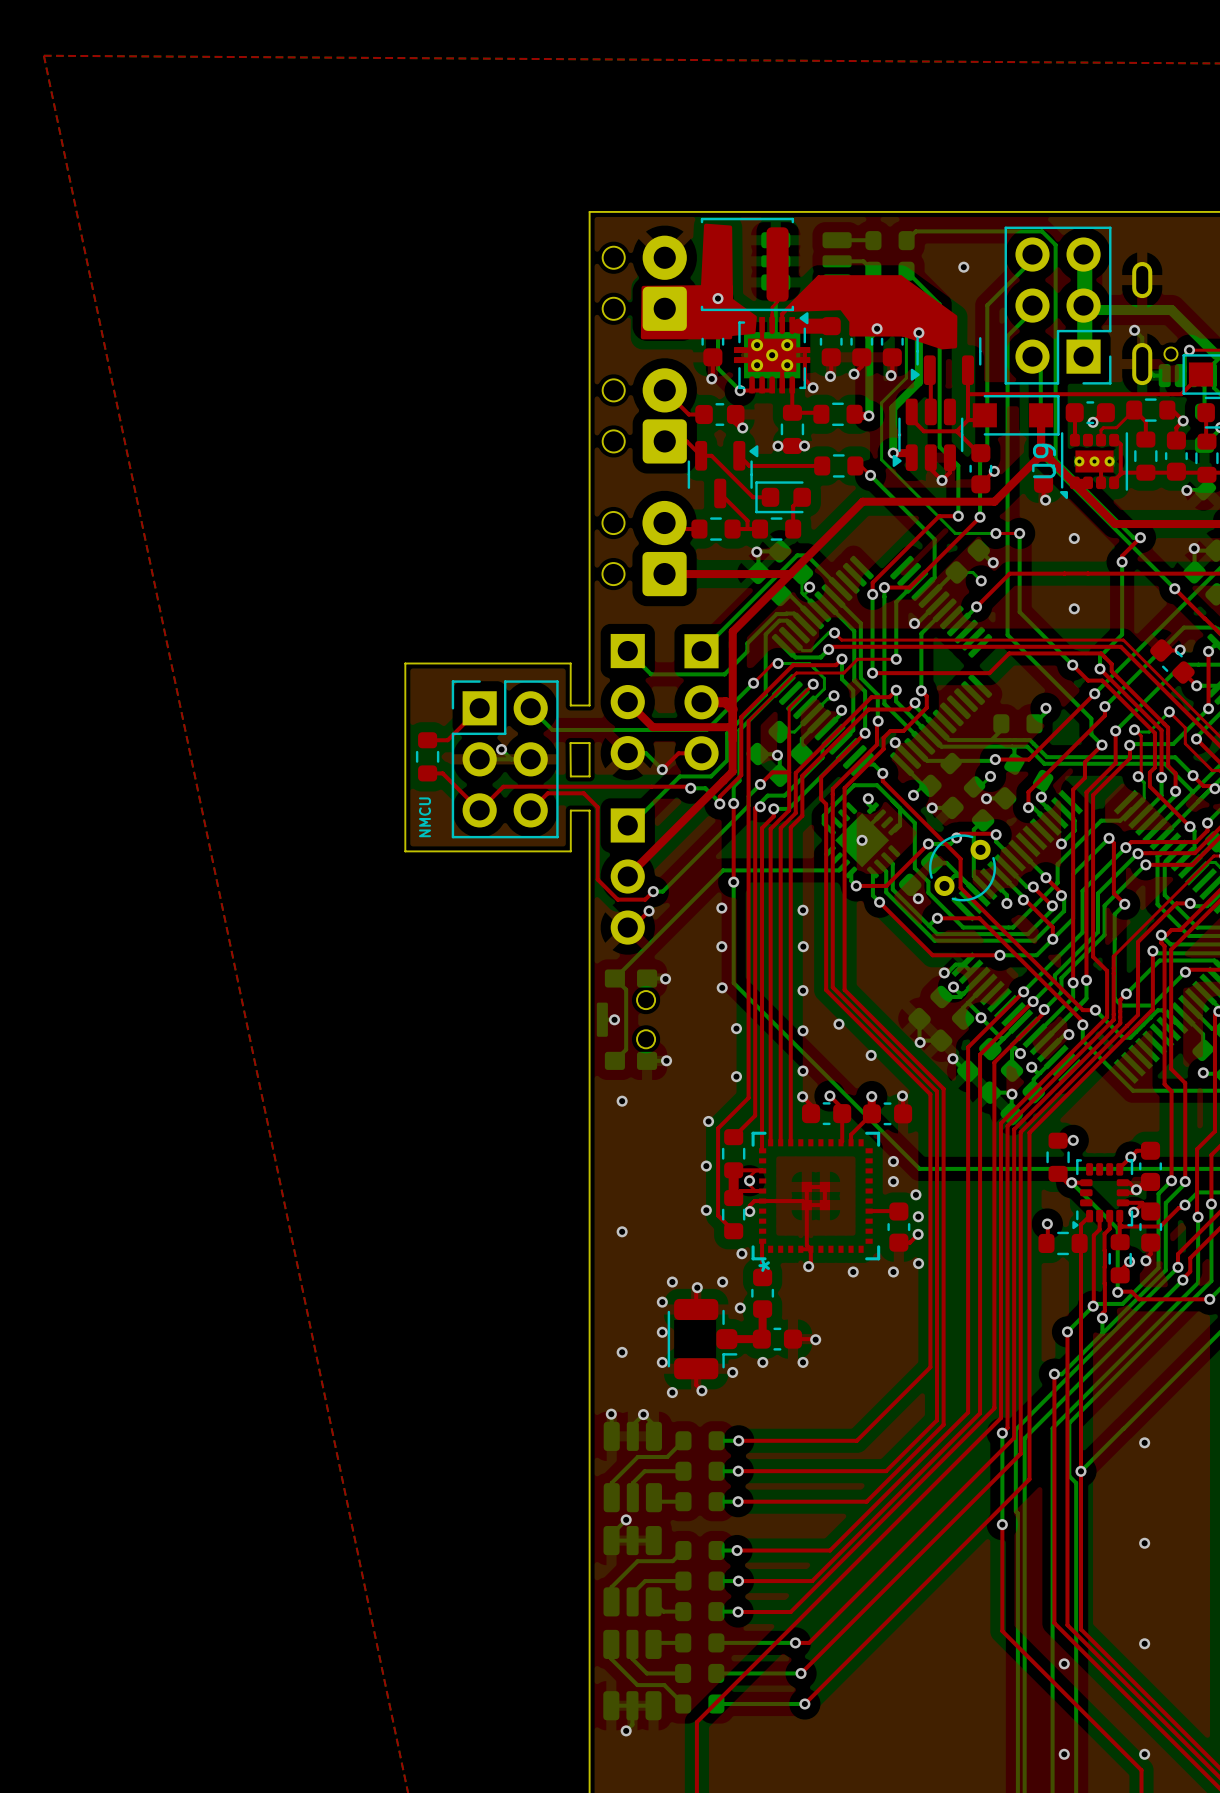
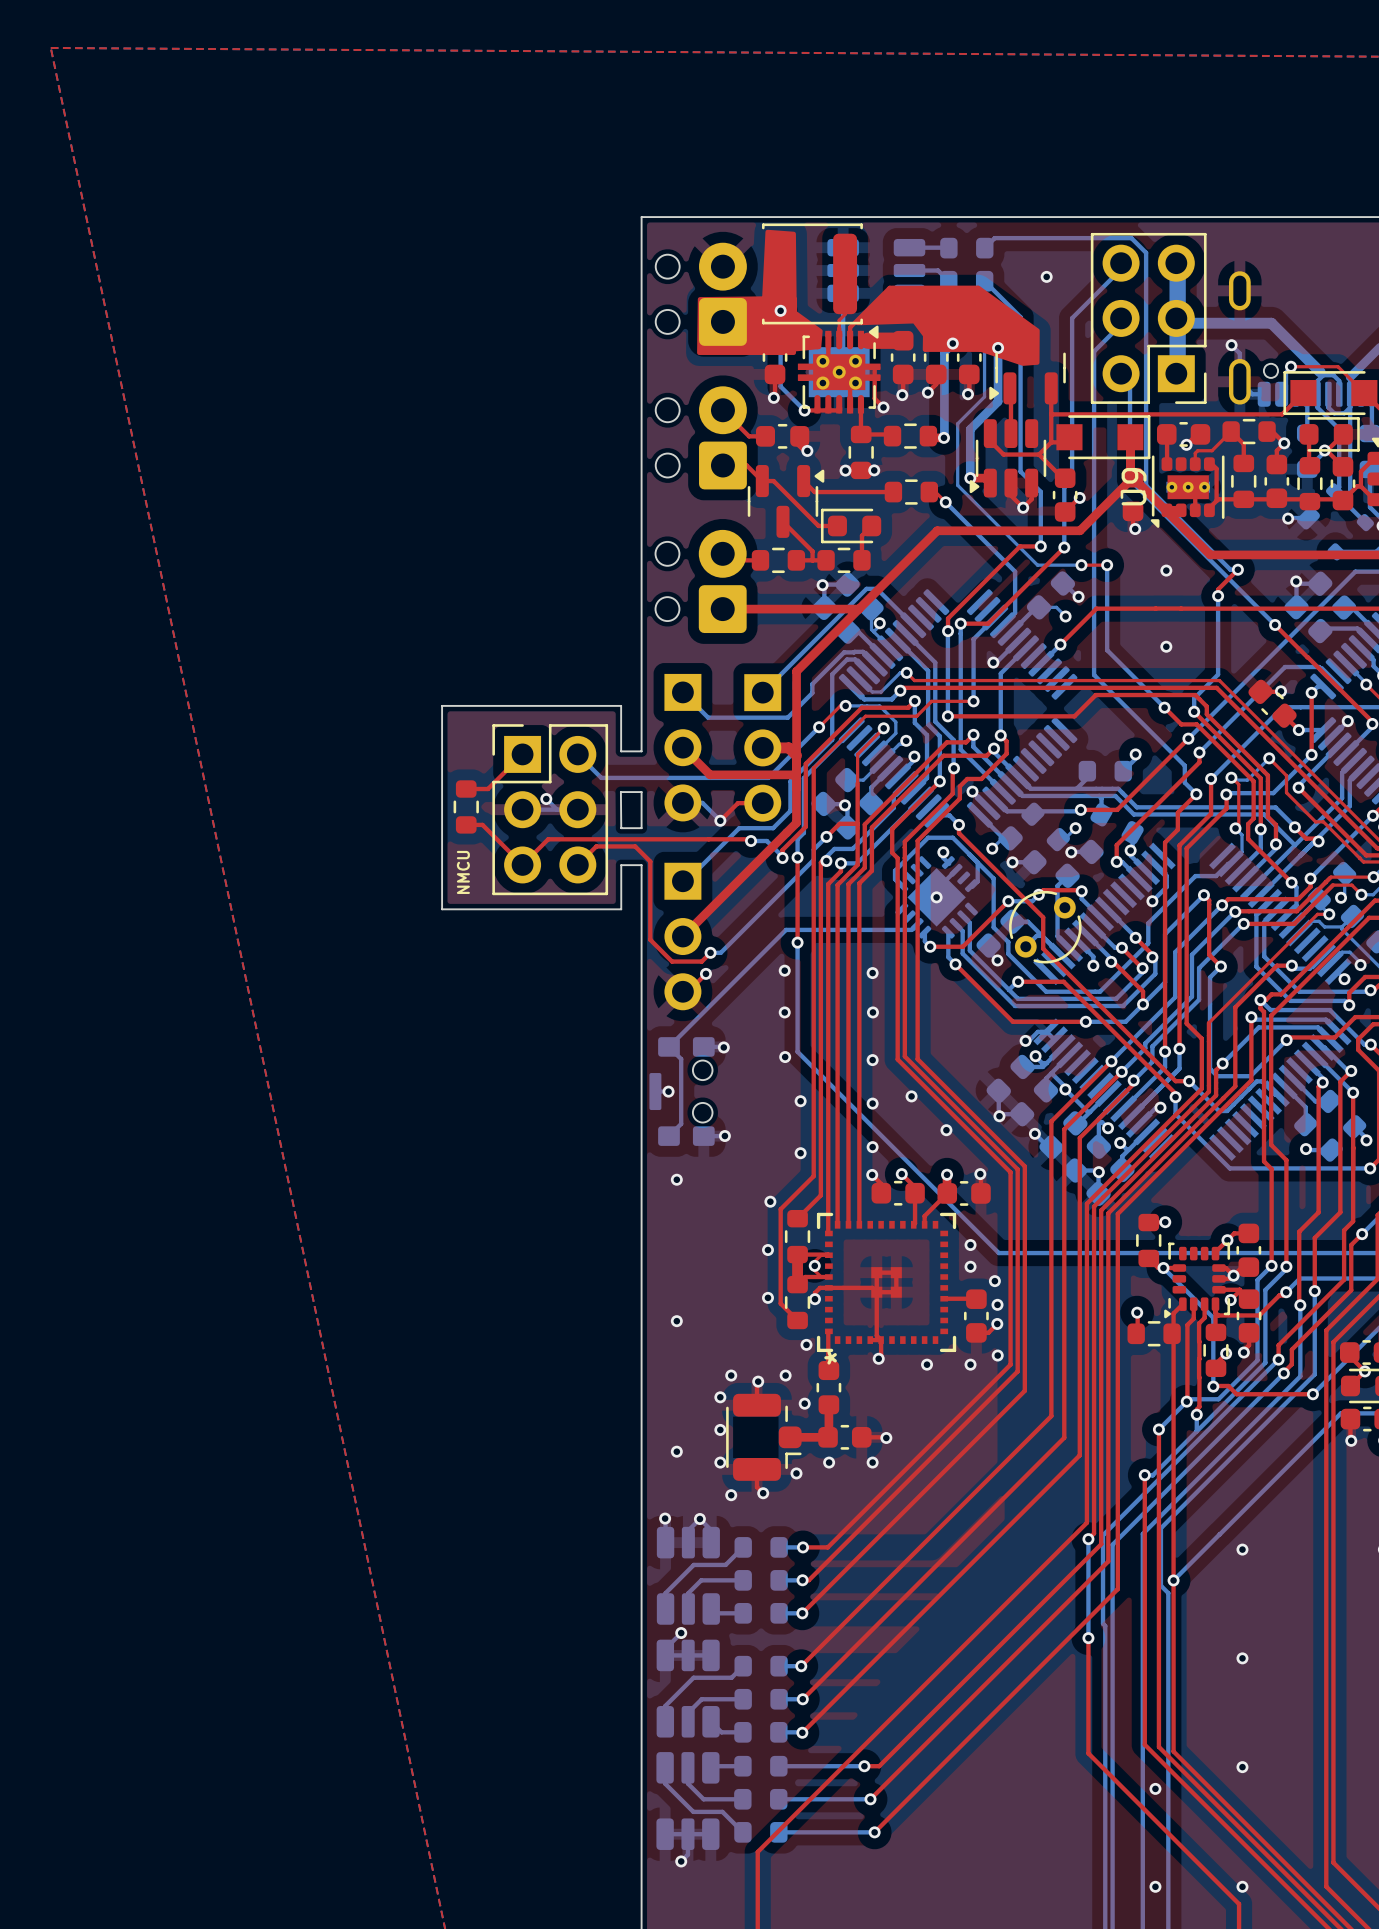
top track: (930, 1271) (930, 1367) (856, 1440) (761, 1440) -> (1010, 1364) (827, 1547)
top track: (937, 1278) (937, 1420) (886, 1471) (744, 1471) -> (1017, 1371) (808, 1580)
top track: (943, 1296) (943, 1424) (866, 1501) (738, 1501) -> (1024, 1390) (802, 1613)
top track: (968, 1319) (968, 1412) (830, 1550) (737, 1550) -> (1051, 1416) (801, 1666)
top track: (980, 1339) (980, 1413) (812, 1581) (738, 1581) -> (1064, 1437) (802, 1699)
top track: (994, 1355) (994, 1408) (790, 1612) (738, 1612) -> (1079, 1455) (802, 1732)

